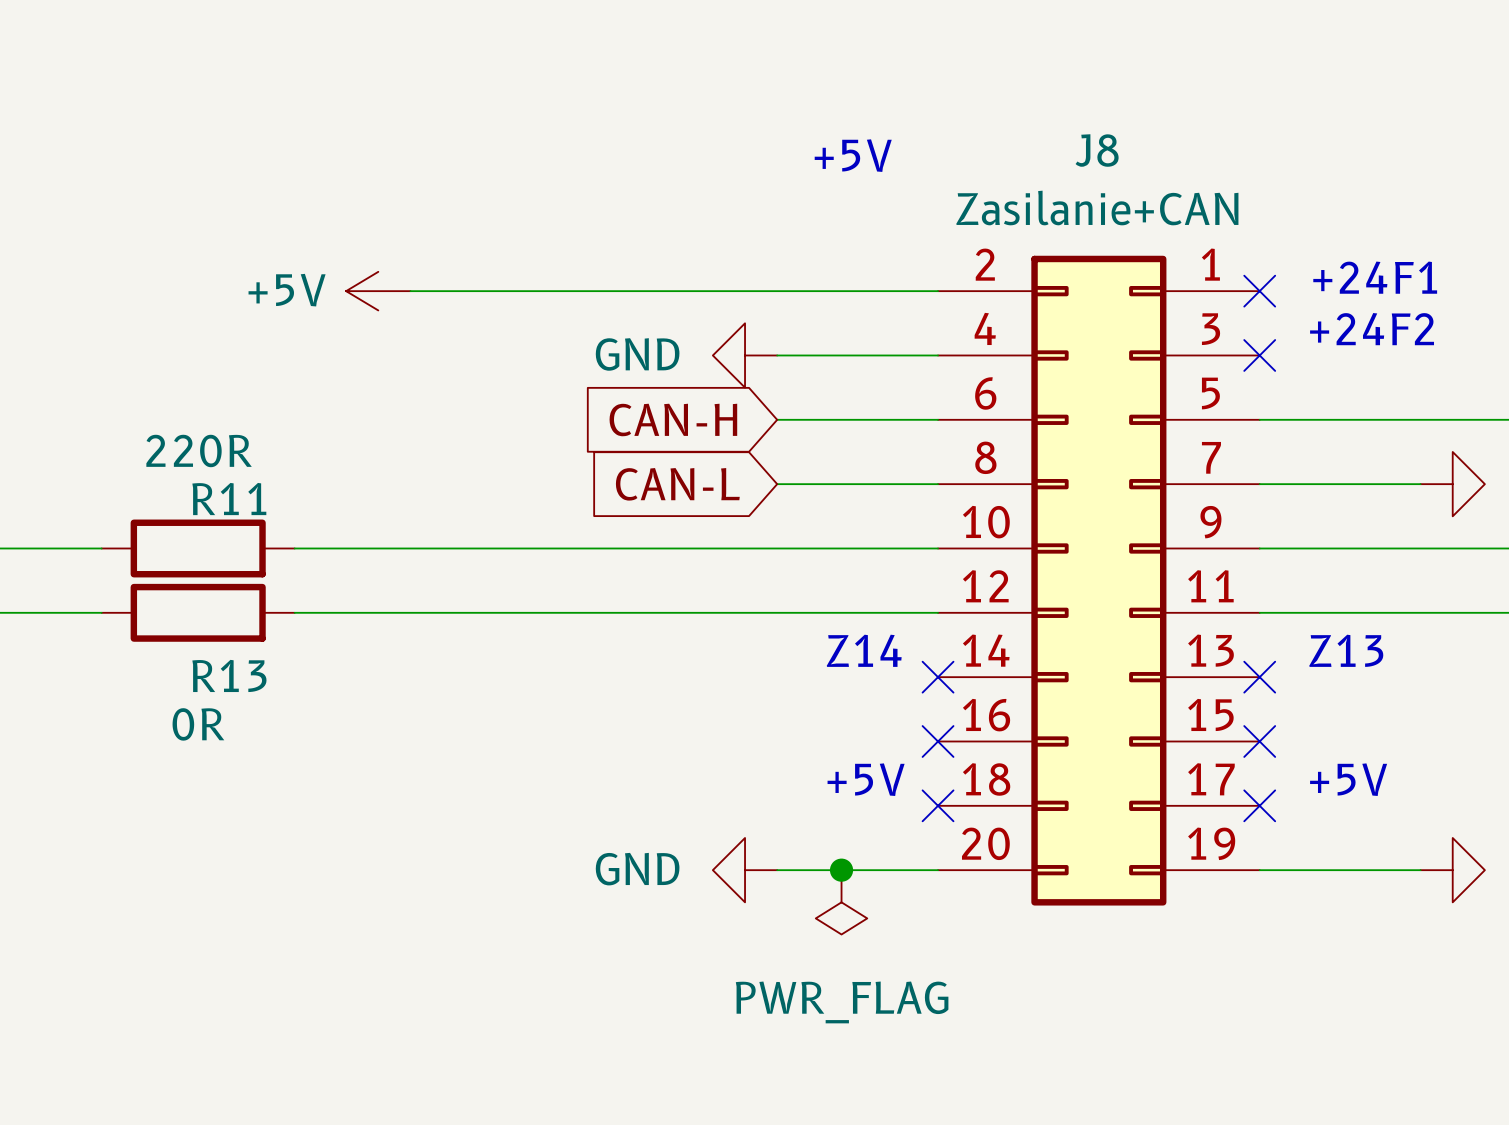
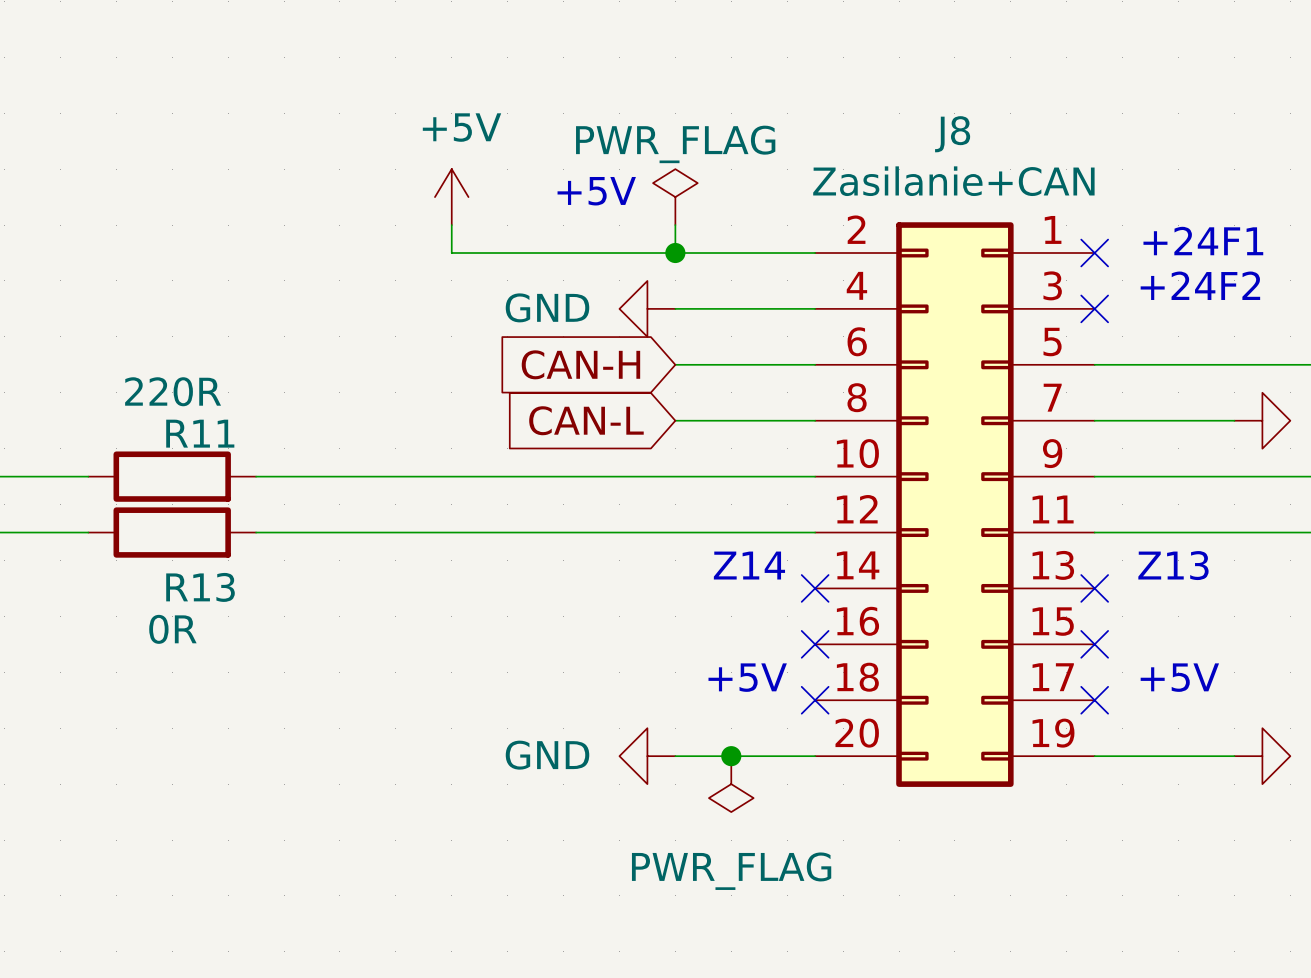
text position: +5V (853, 155) -> +5V (596, 191)
power symbol: none -> PWR_FLAG (675, 197)
wire: none -> (675, 225) (675, 253)
power symbol rotation: 0° (378, 291) -> 90° clockwise (451, 197)
power symbol position: +5V (378, 291) -> +5V (451, 197)
wire: (410, 291) (519, 291) -> (451, 225) (451, 253)
junction: none -> (675, 253)

